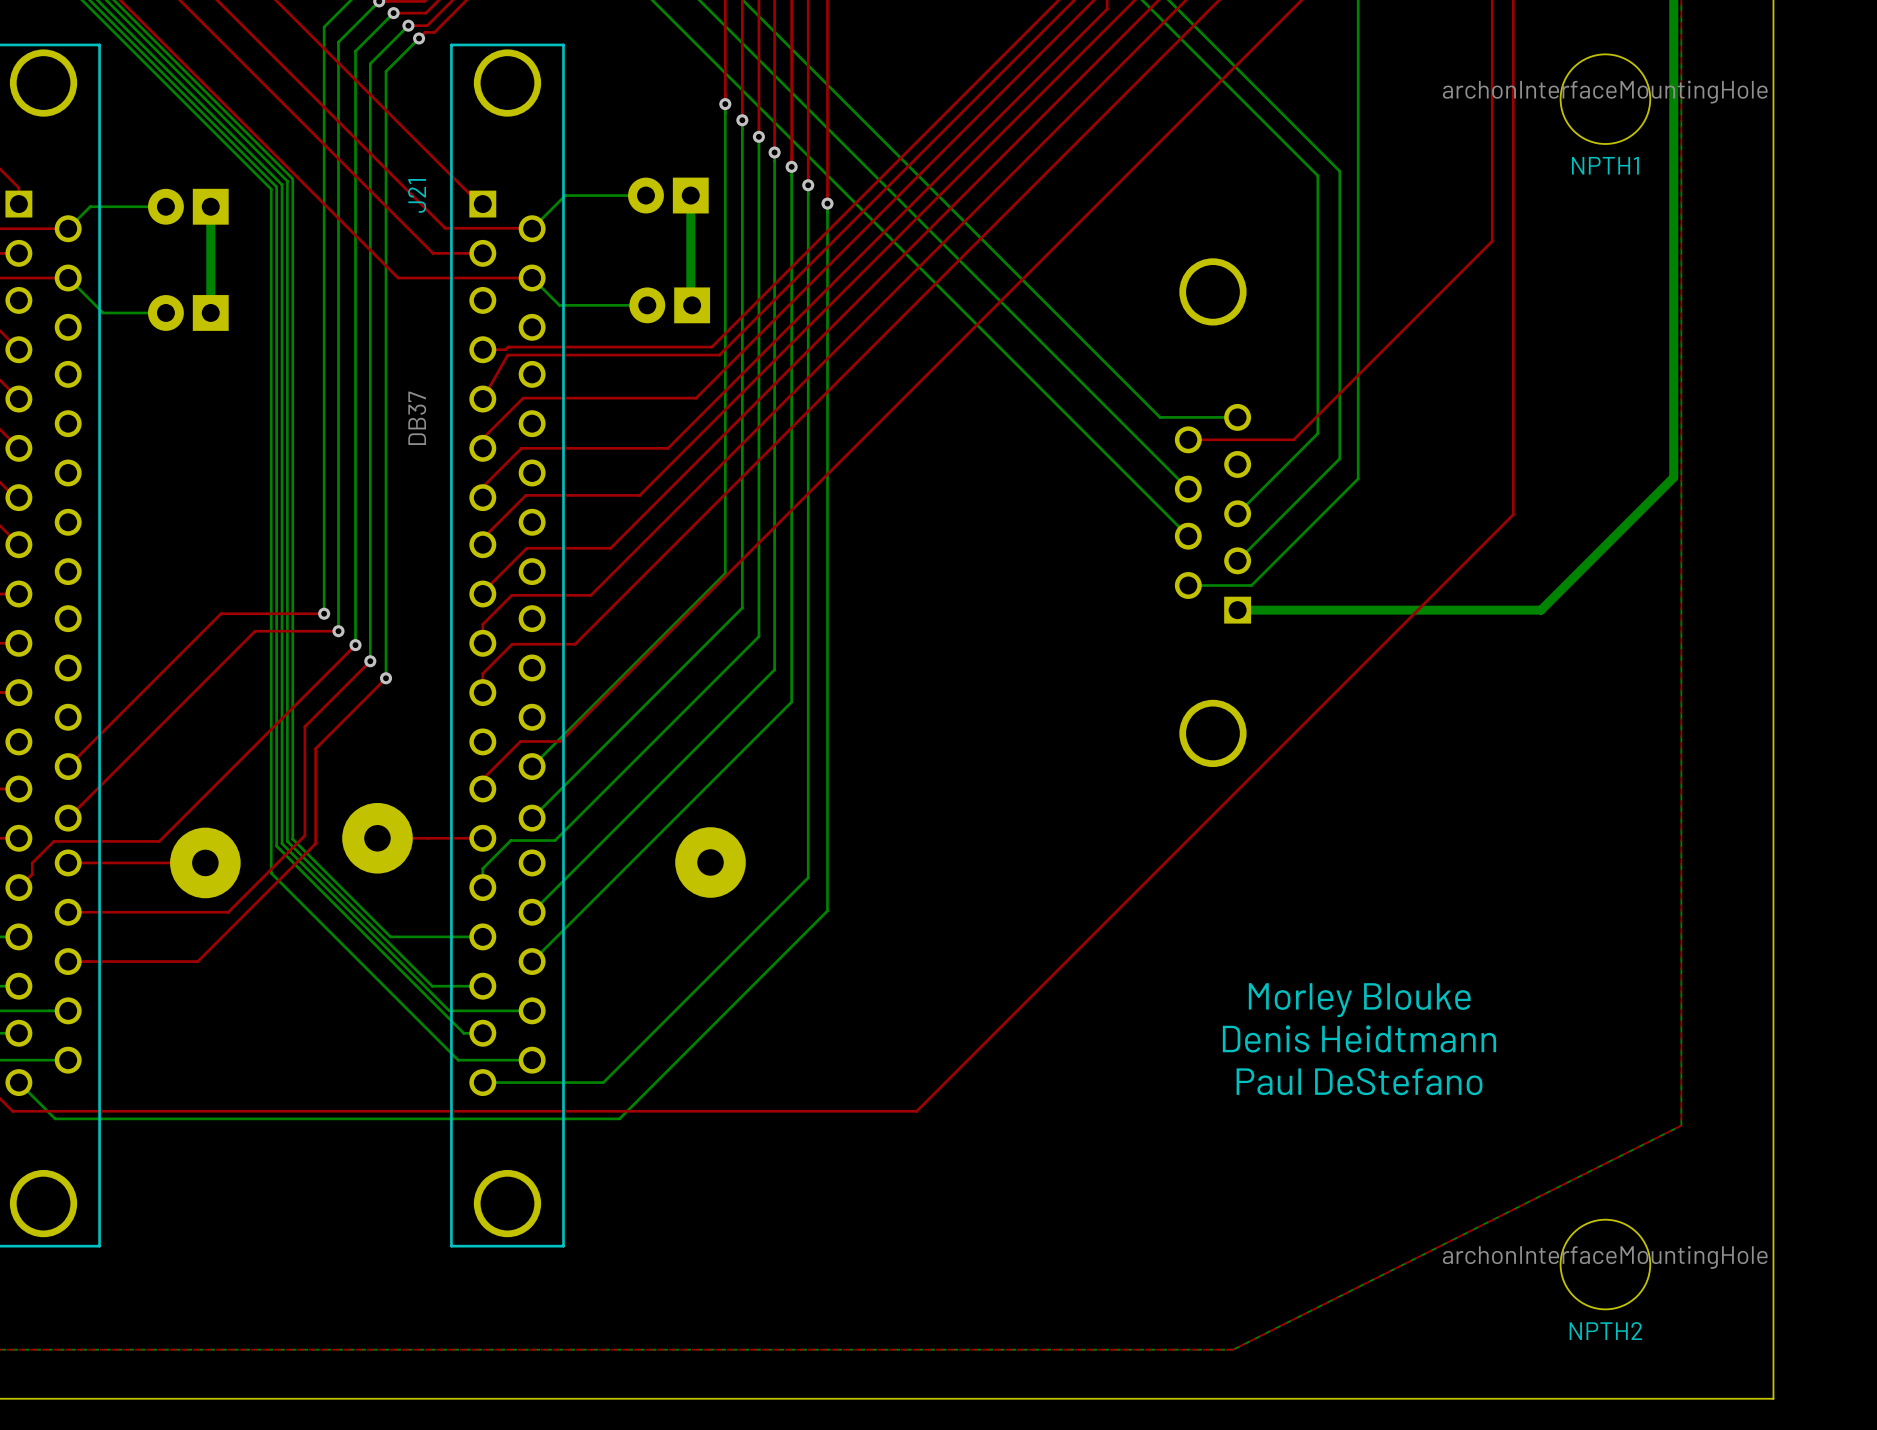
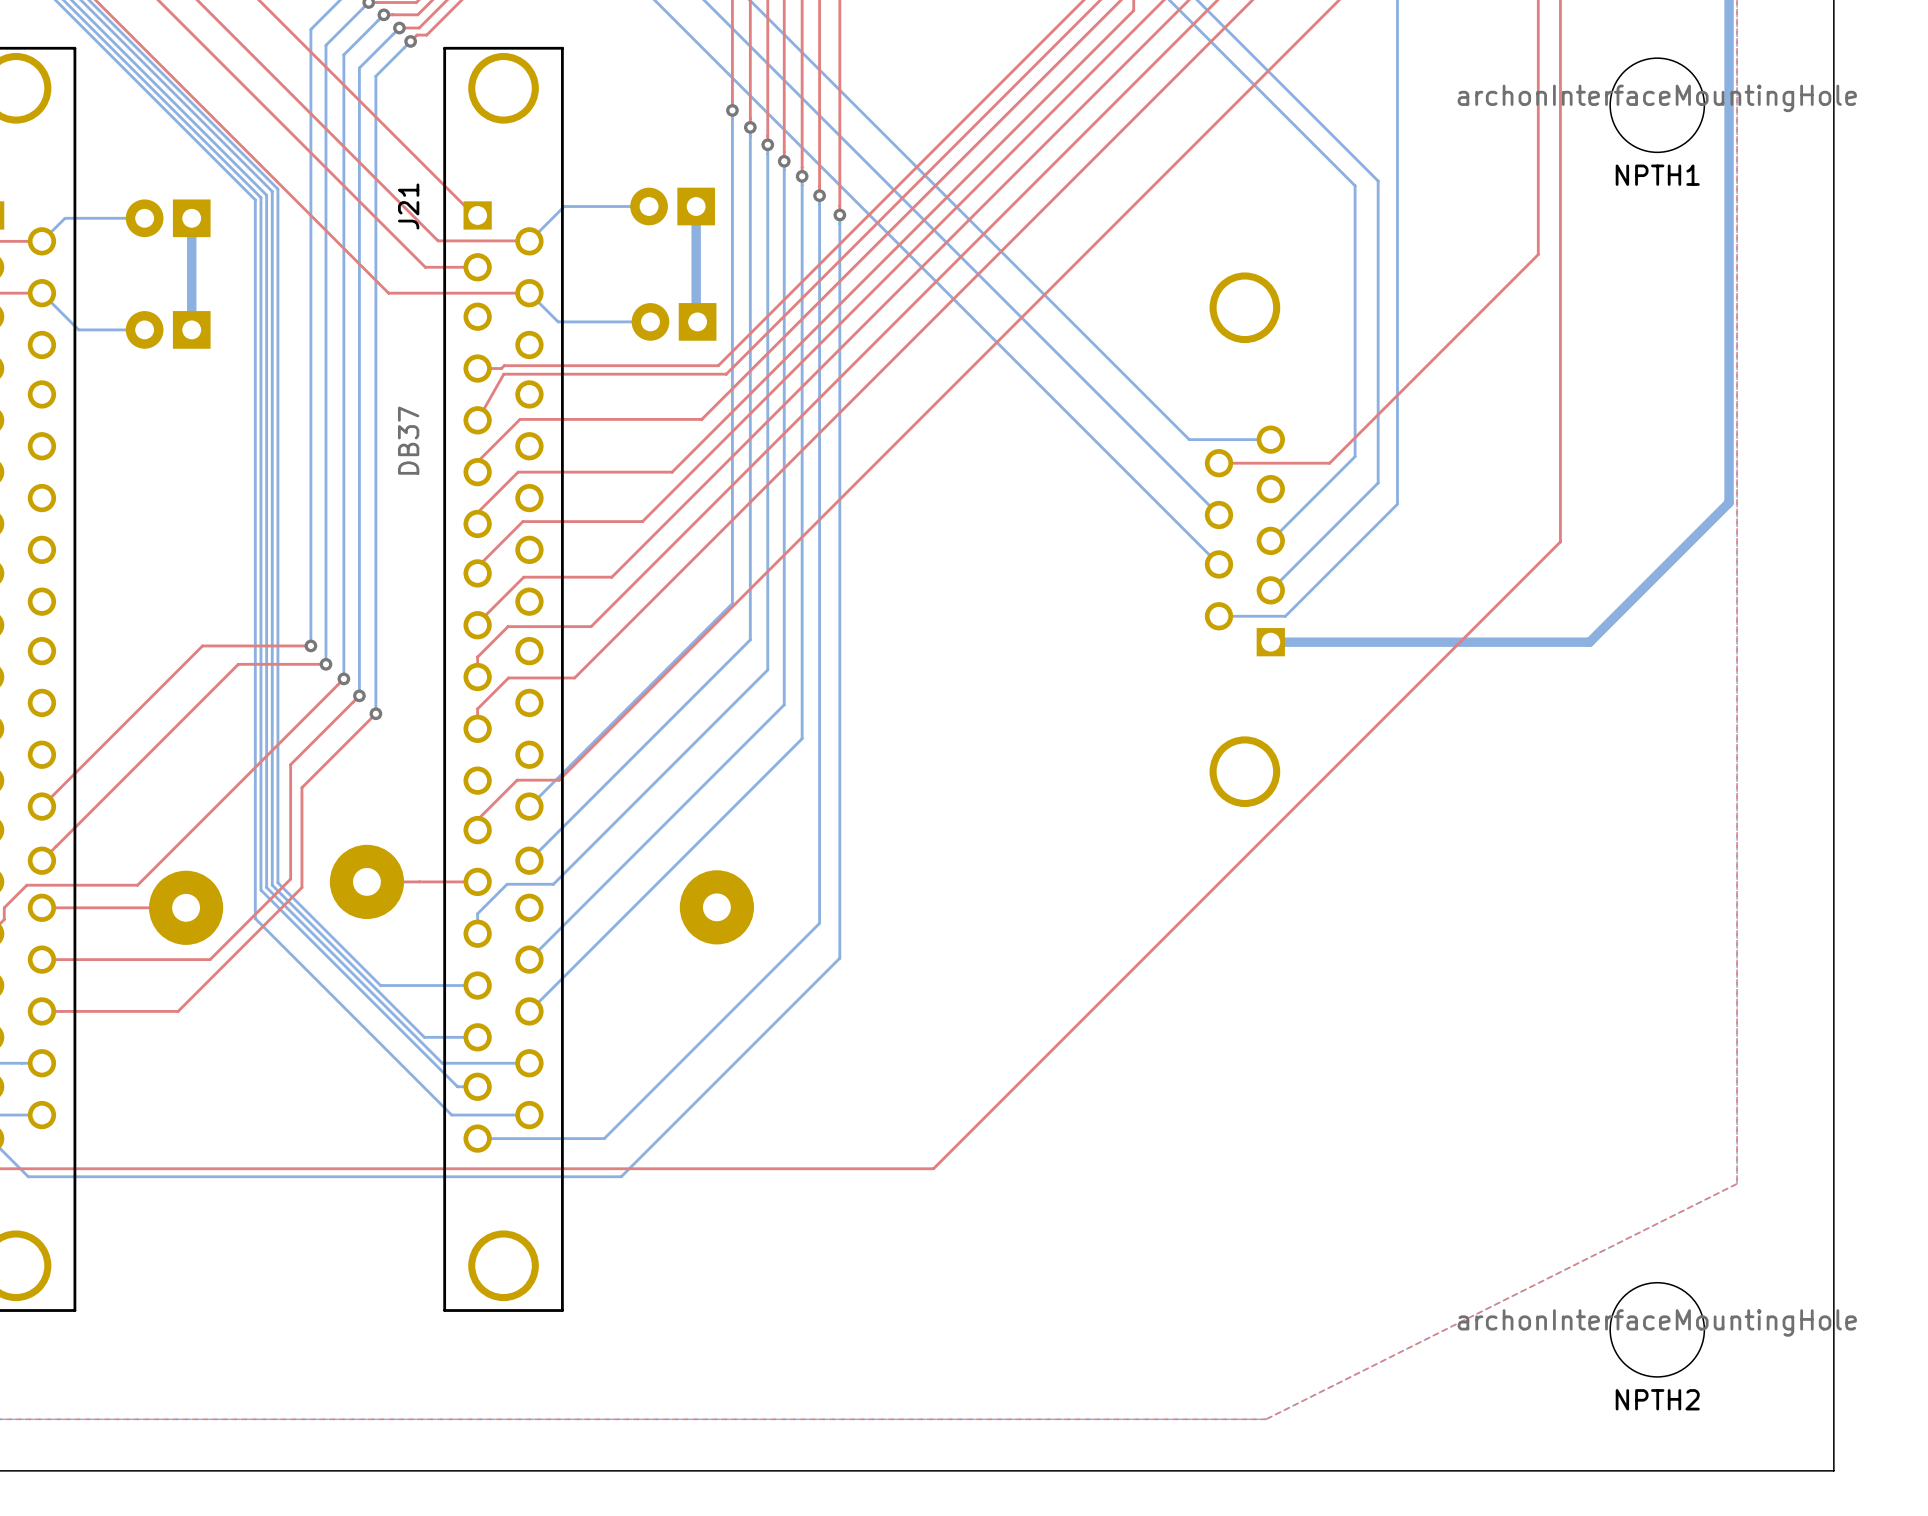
text: Morley Blouke (1359, 1000) -> none
text: Denis Heidtmann (1359, 1038) -> none
text: Paul DeStefano (1359, 1081) -> none

